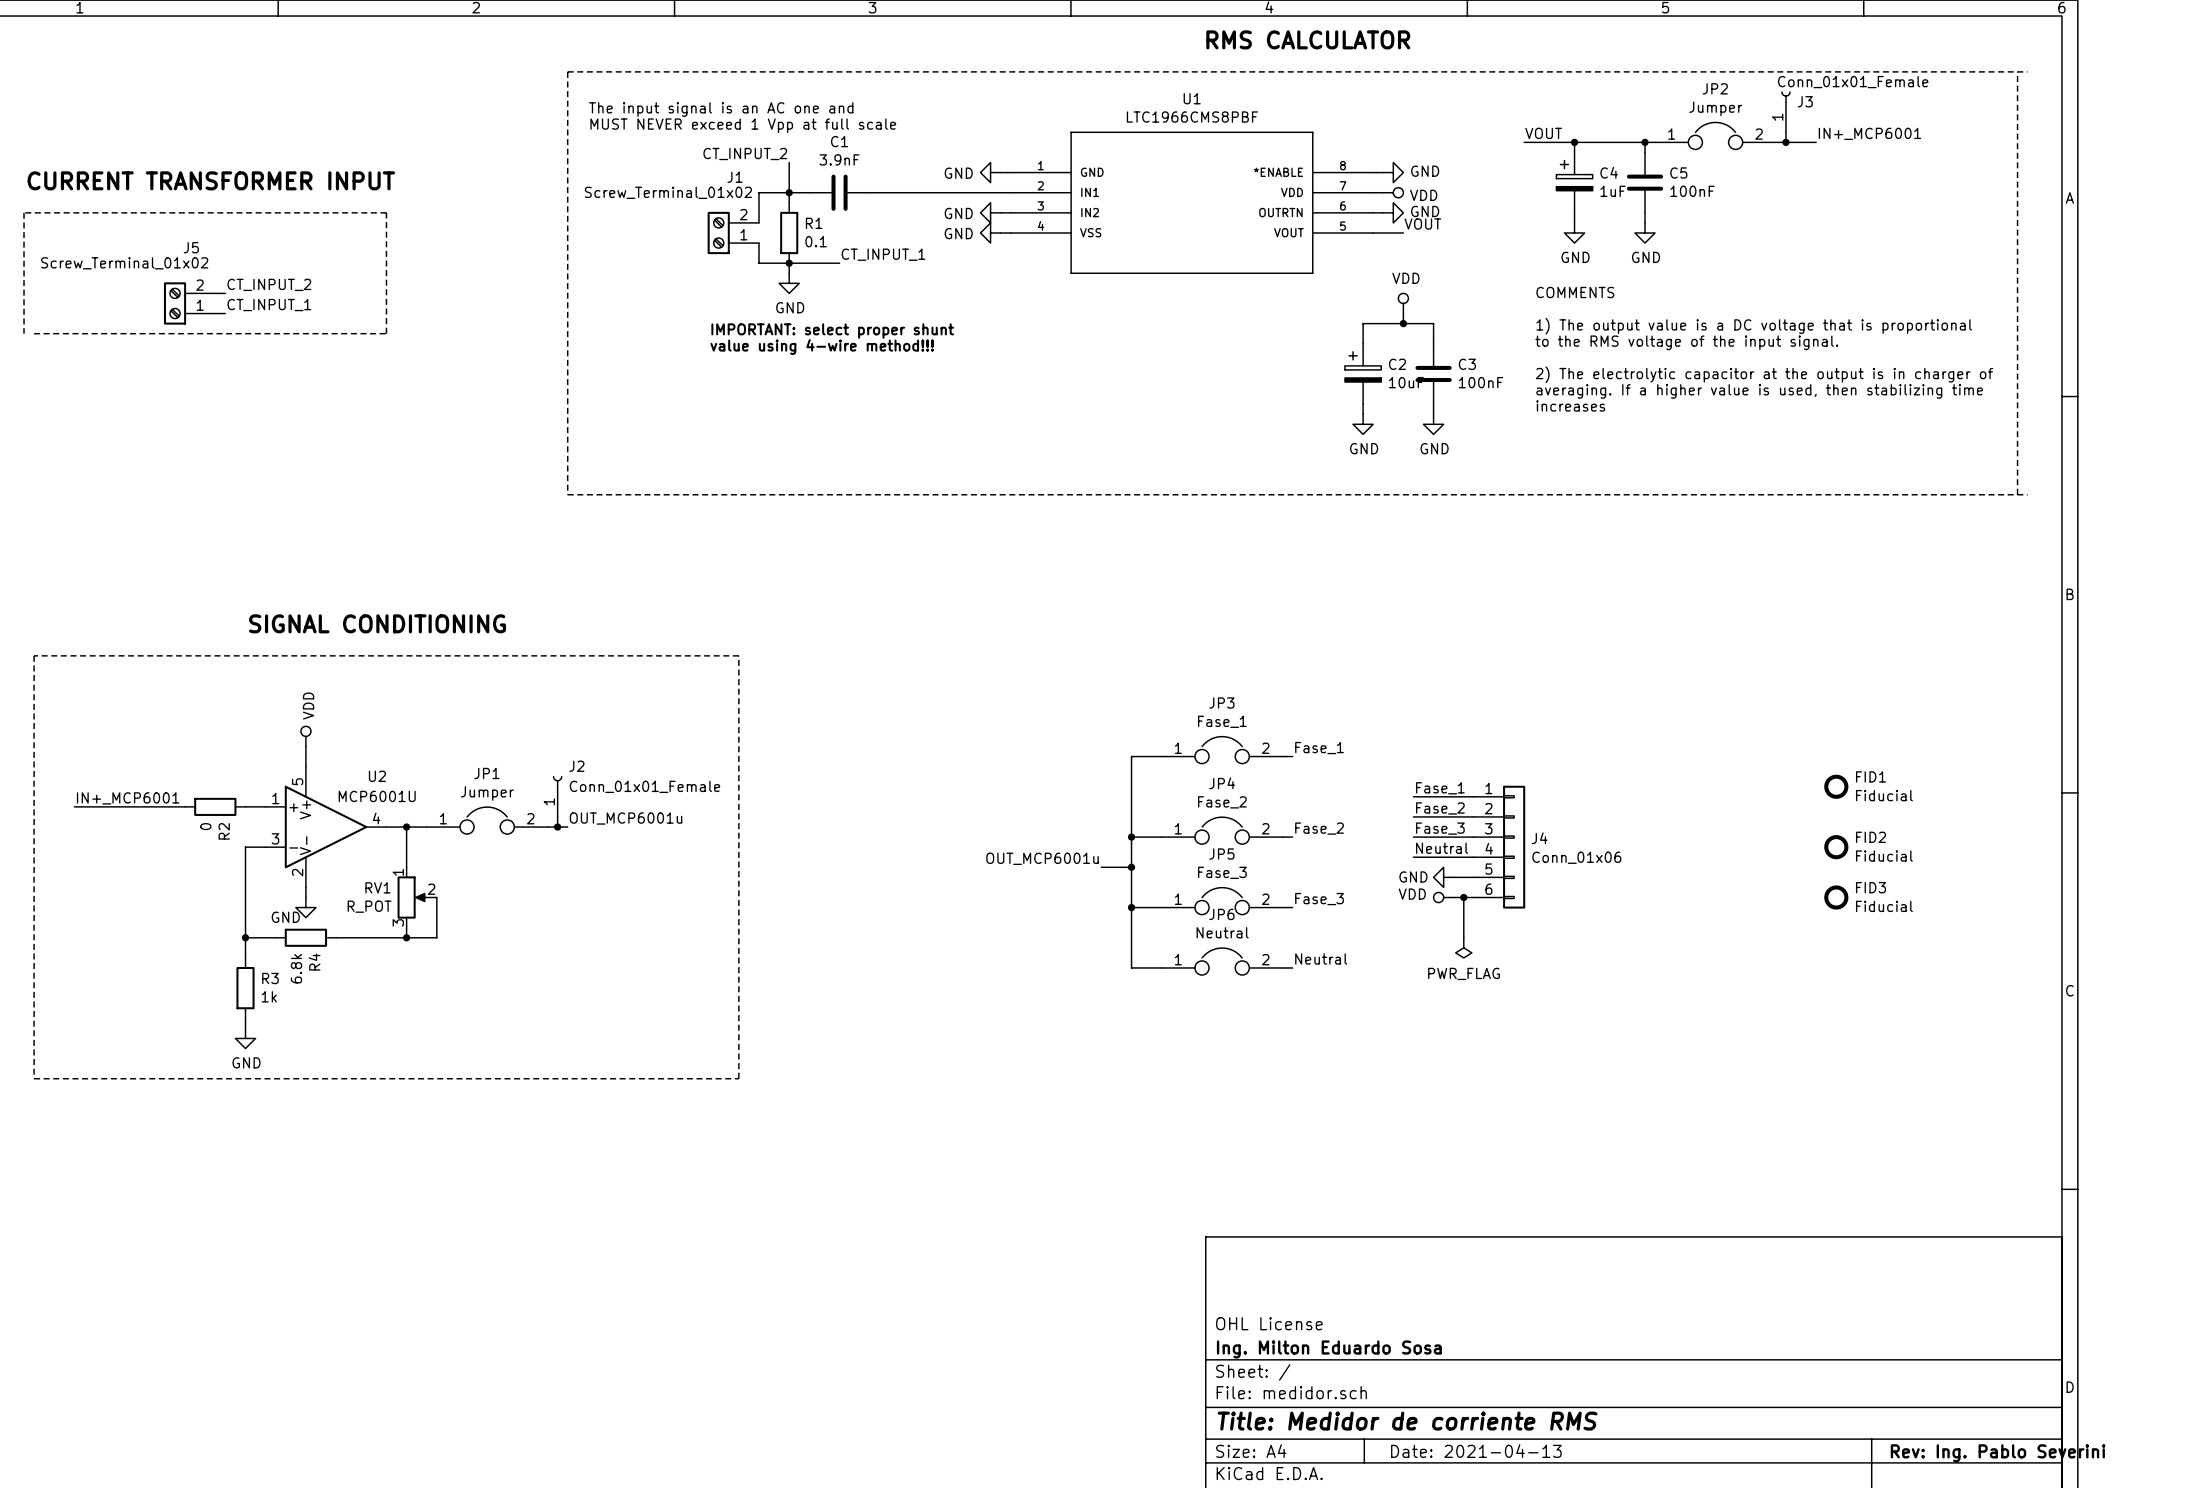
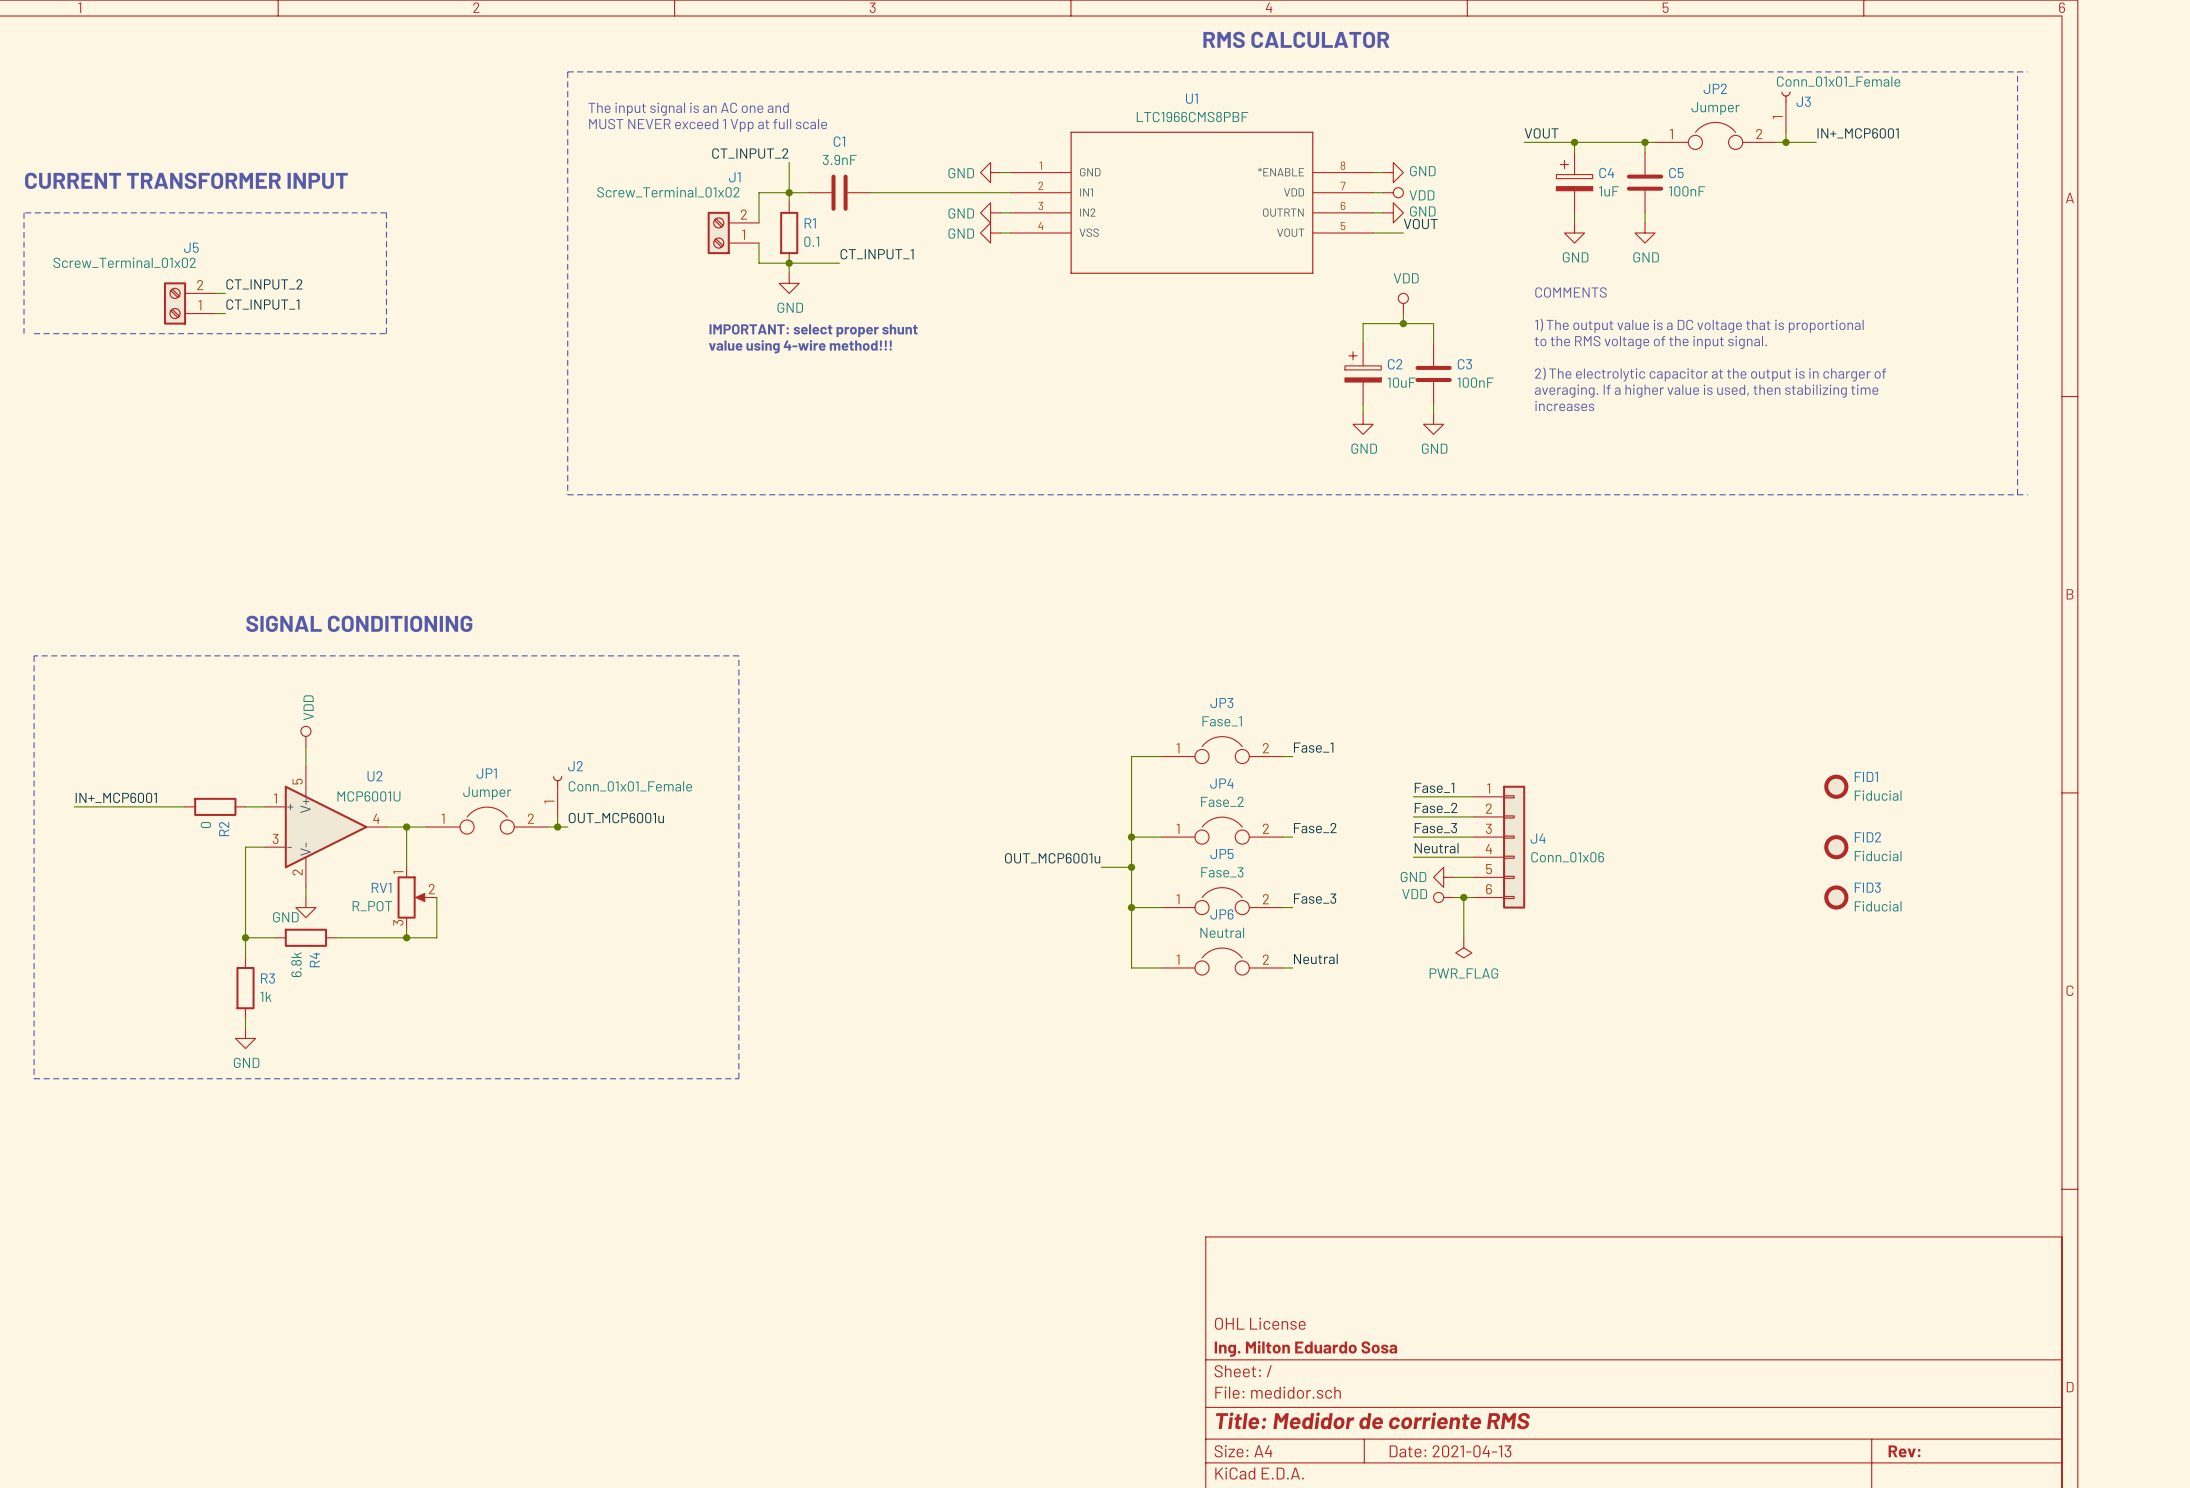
title block: Rev: Ing. Pablo Severini (1998, 1453) -> Rev: (1904, 1451)

